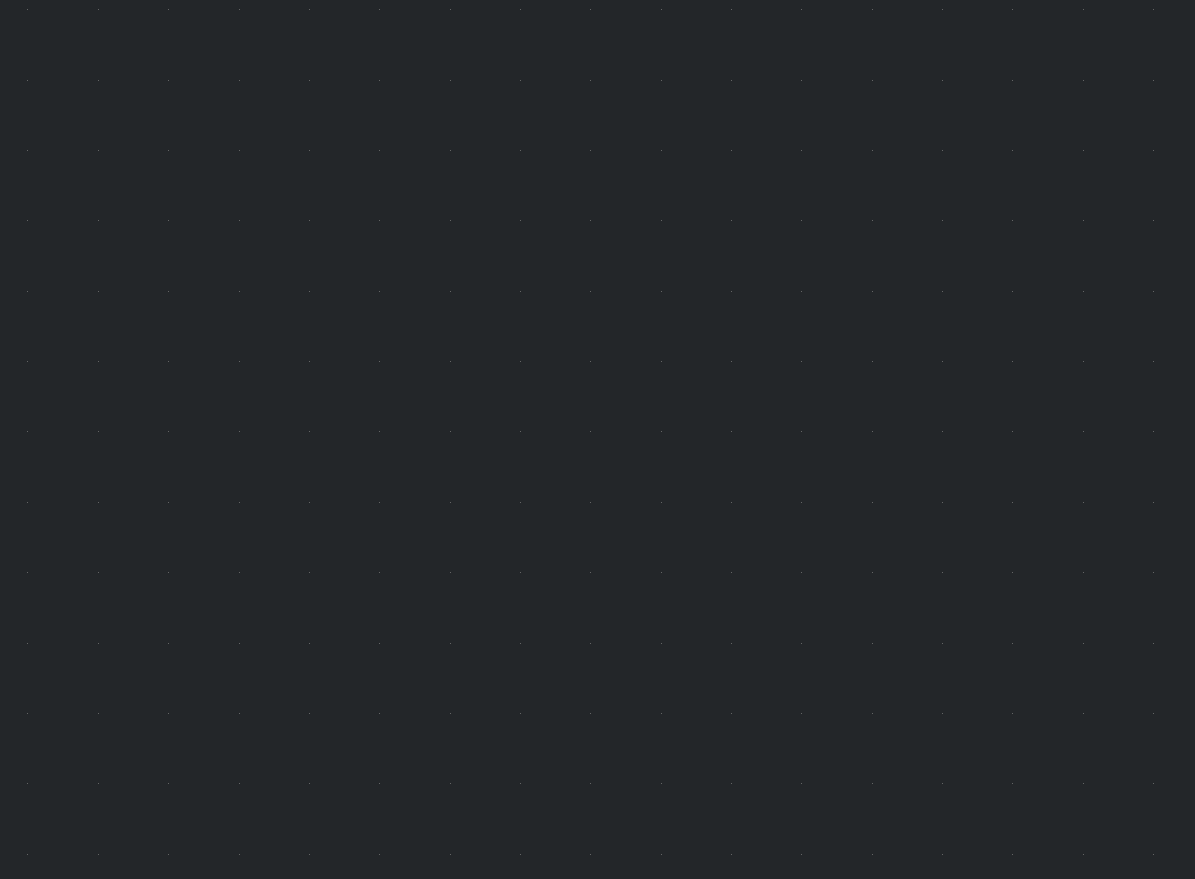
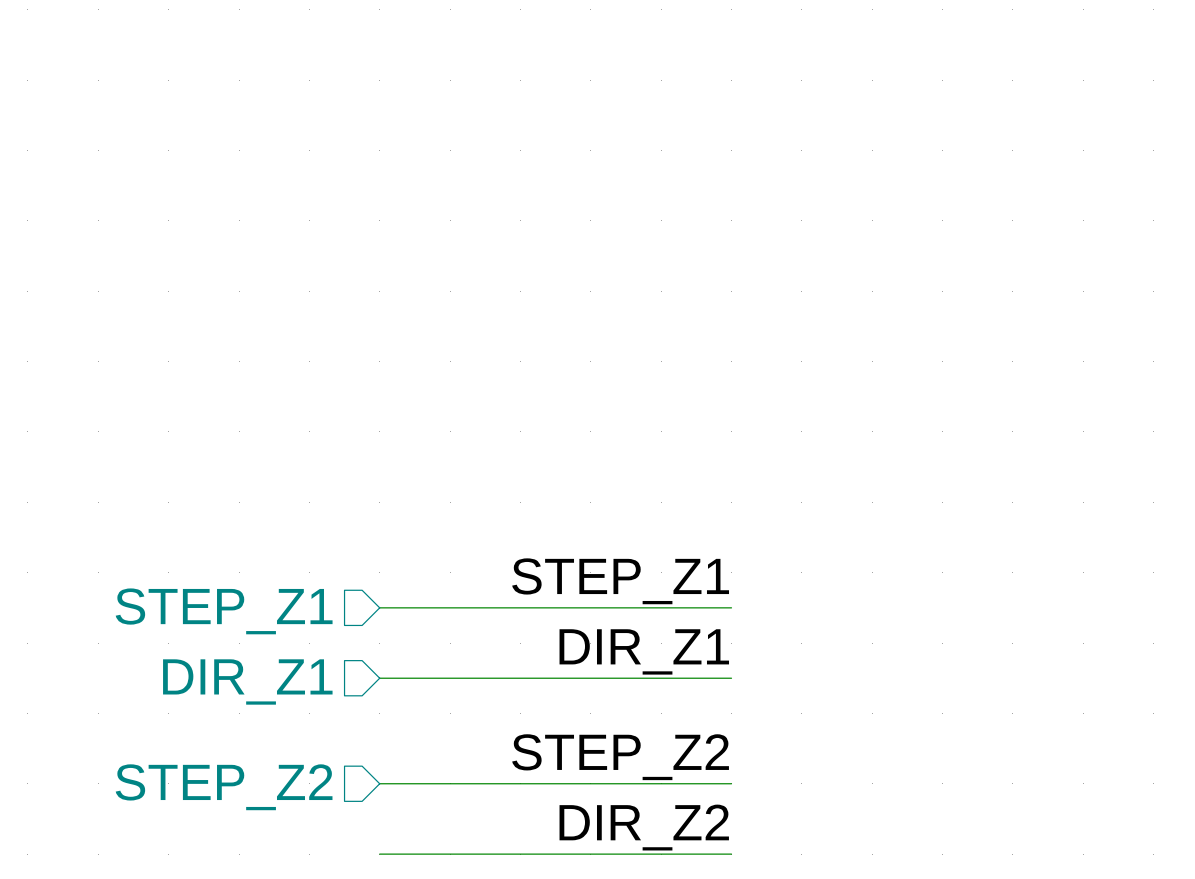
label: none -> STEP_Z1 (620, 581)
wire: none -> (379, 607) (731, 607)
sheet pin: none -> STEP_Z1 (224, 611)
label: none -> DIR_Z1 (644, 651)
sheet pin: none -> DIR_Z1 (247, 681)
wire: none -> (379, 678) (731, 678)
label: none -> STEP_Z2 (620, 757)
wire: none -> (379, 783) (731, 783)
sheet pin: none -> STEP_Z2 (224, 787)
label: none -> DIR_Z2 (644, 827)
wire: none -> (379, 854) (731, 854)

